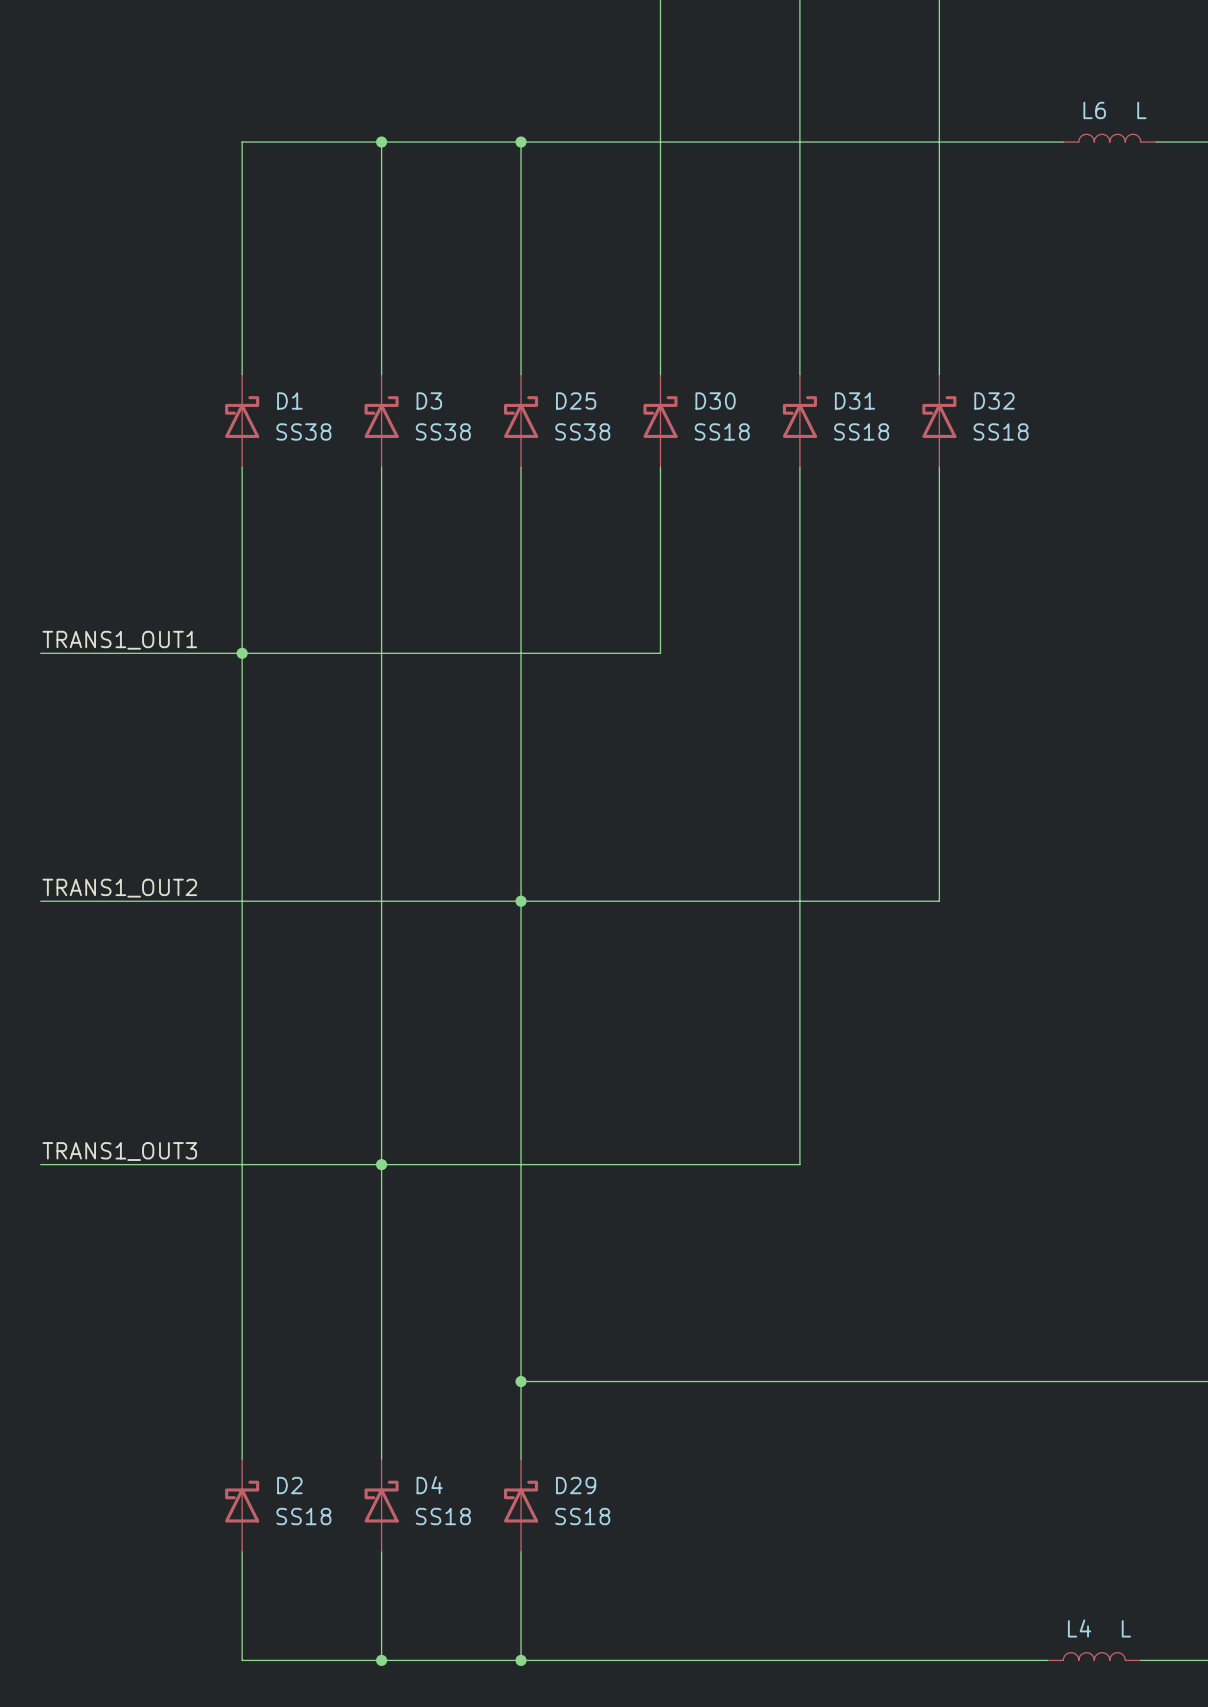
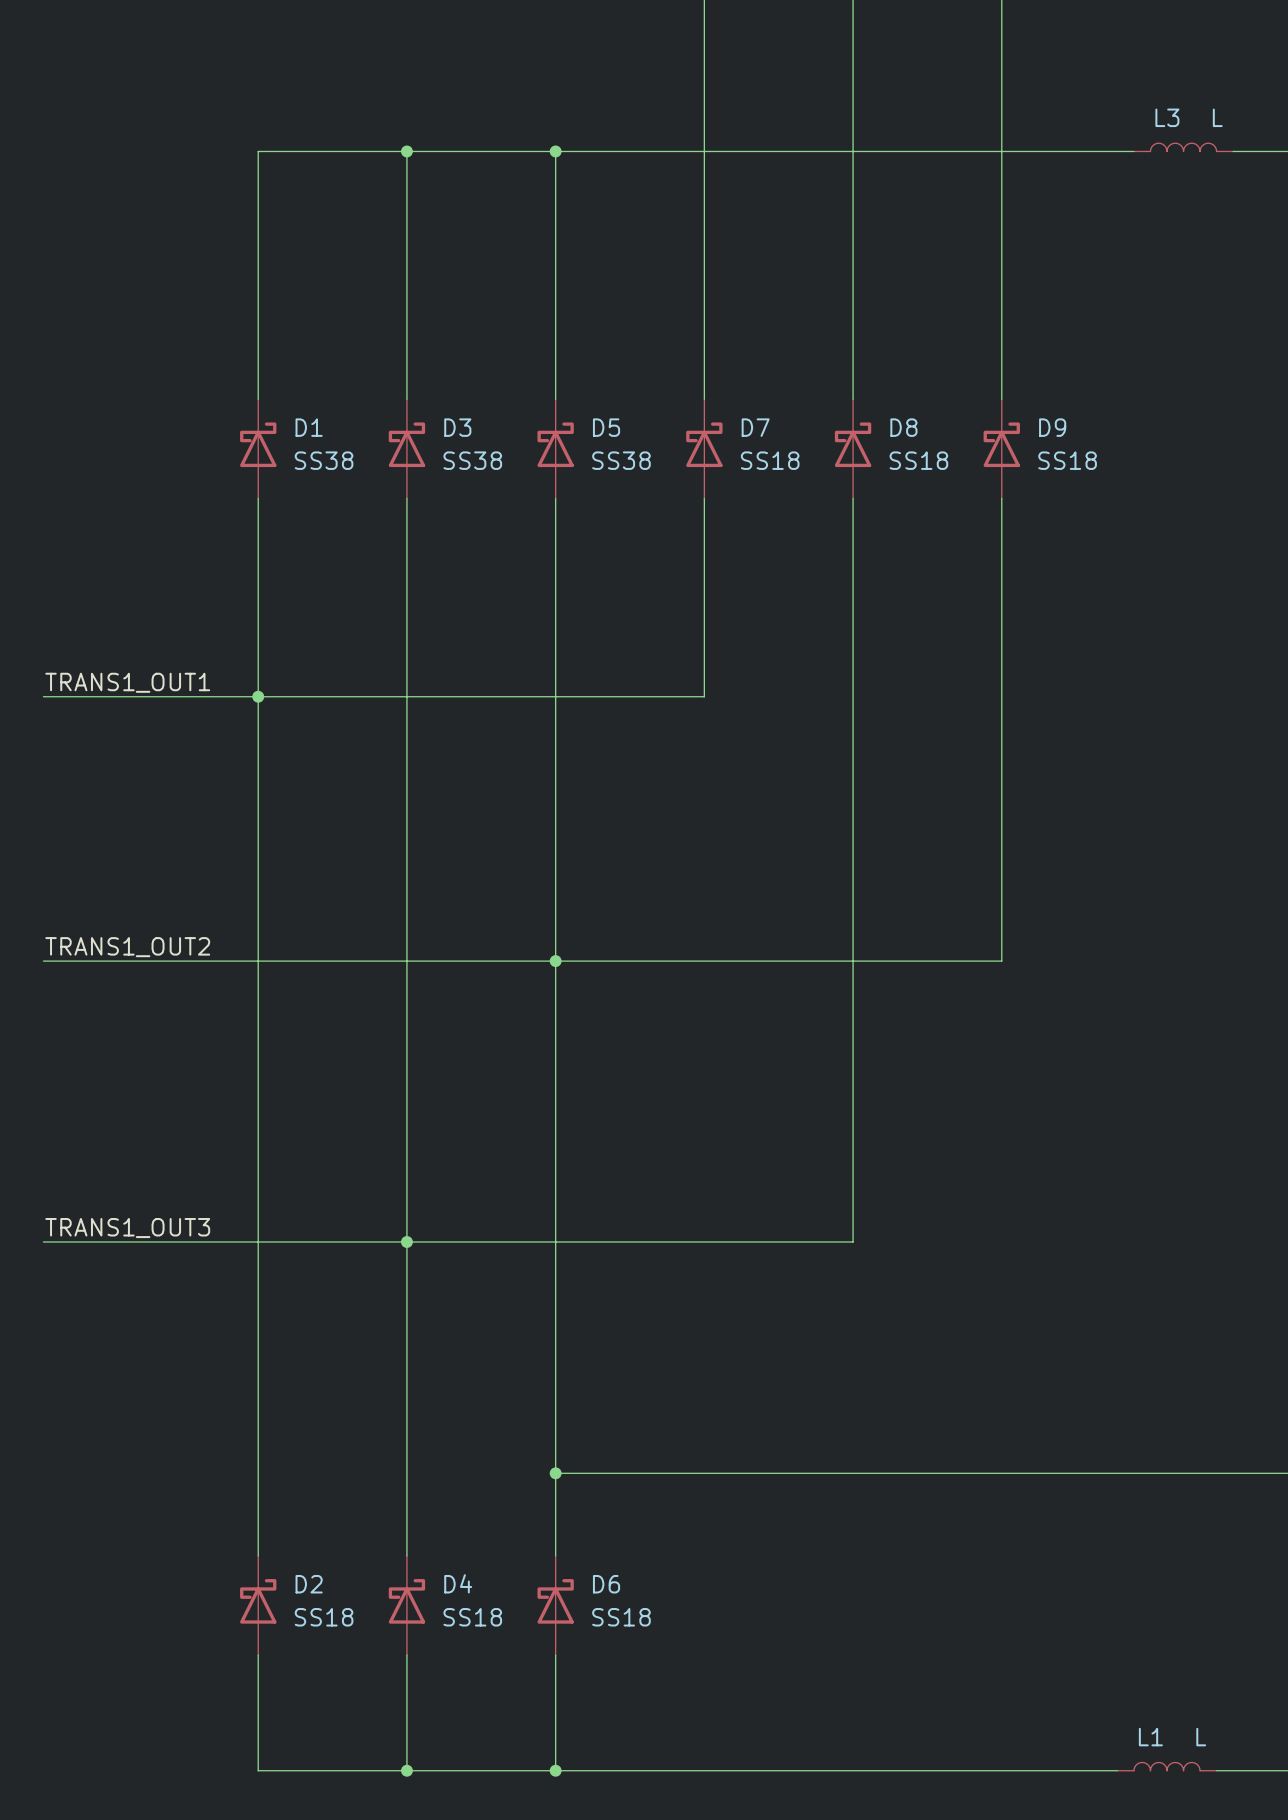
L6 name: L6 (1094, 110) -> L3 (1167, 117)
D25 name: D25 (576, 400) -> D5 (606, 427)
D30 name: D30 (715, 400) -> D7 (755, 427)
D31 name: D31 (855, 400) -> D8 (903, 427)
D32 name: D32 (994, 400) -> D9 (1052, 427)
D29 name: D29 (576, 1485) -> D6 (606, 1584)
L4 name: L4 (1079, 1628) -> L1 (1150, 1737)

